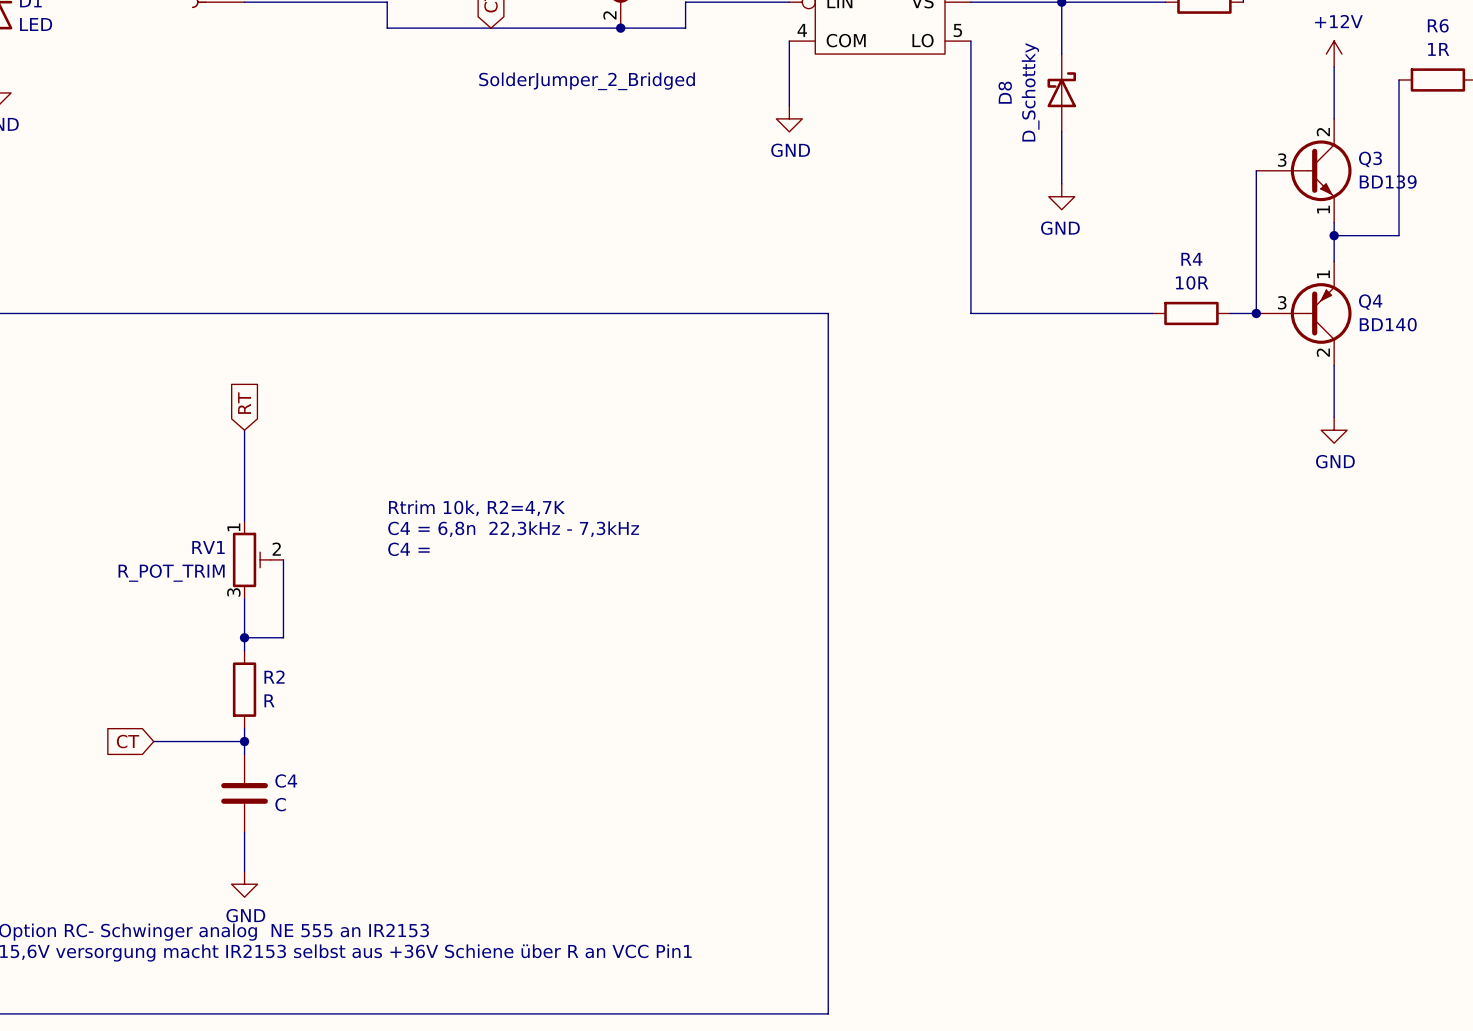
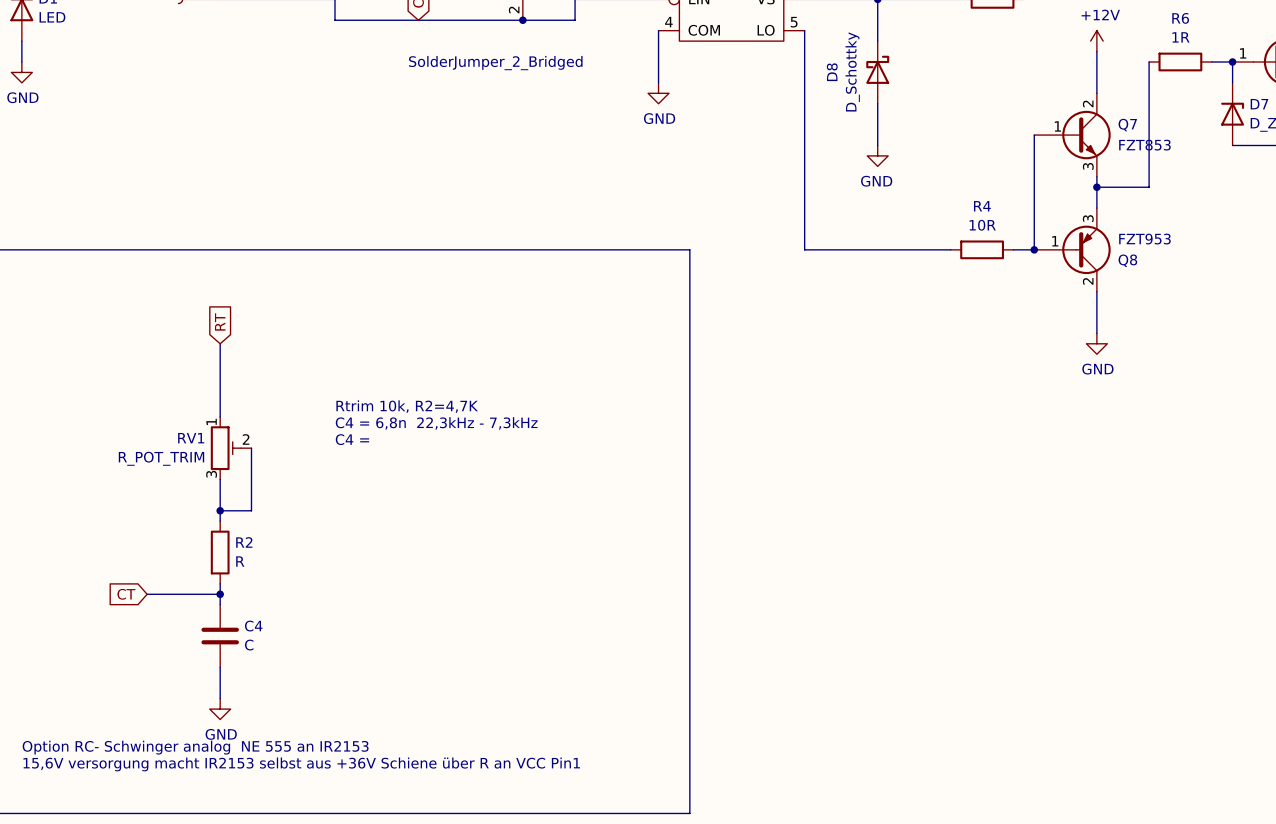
Q3: BD139 (1303, 170) -> none
Q7: none -> FZT853 (1072, 135)
Q4: BD140 (1303, 313) -> none
Q8: none -> FZT953 (1072, 249)

